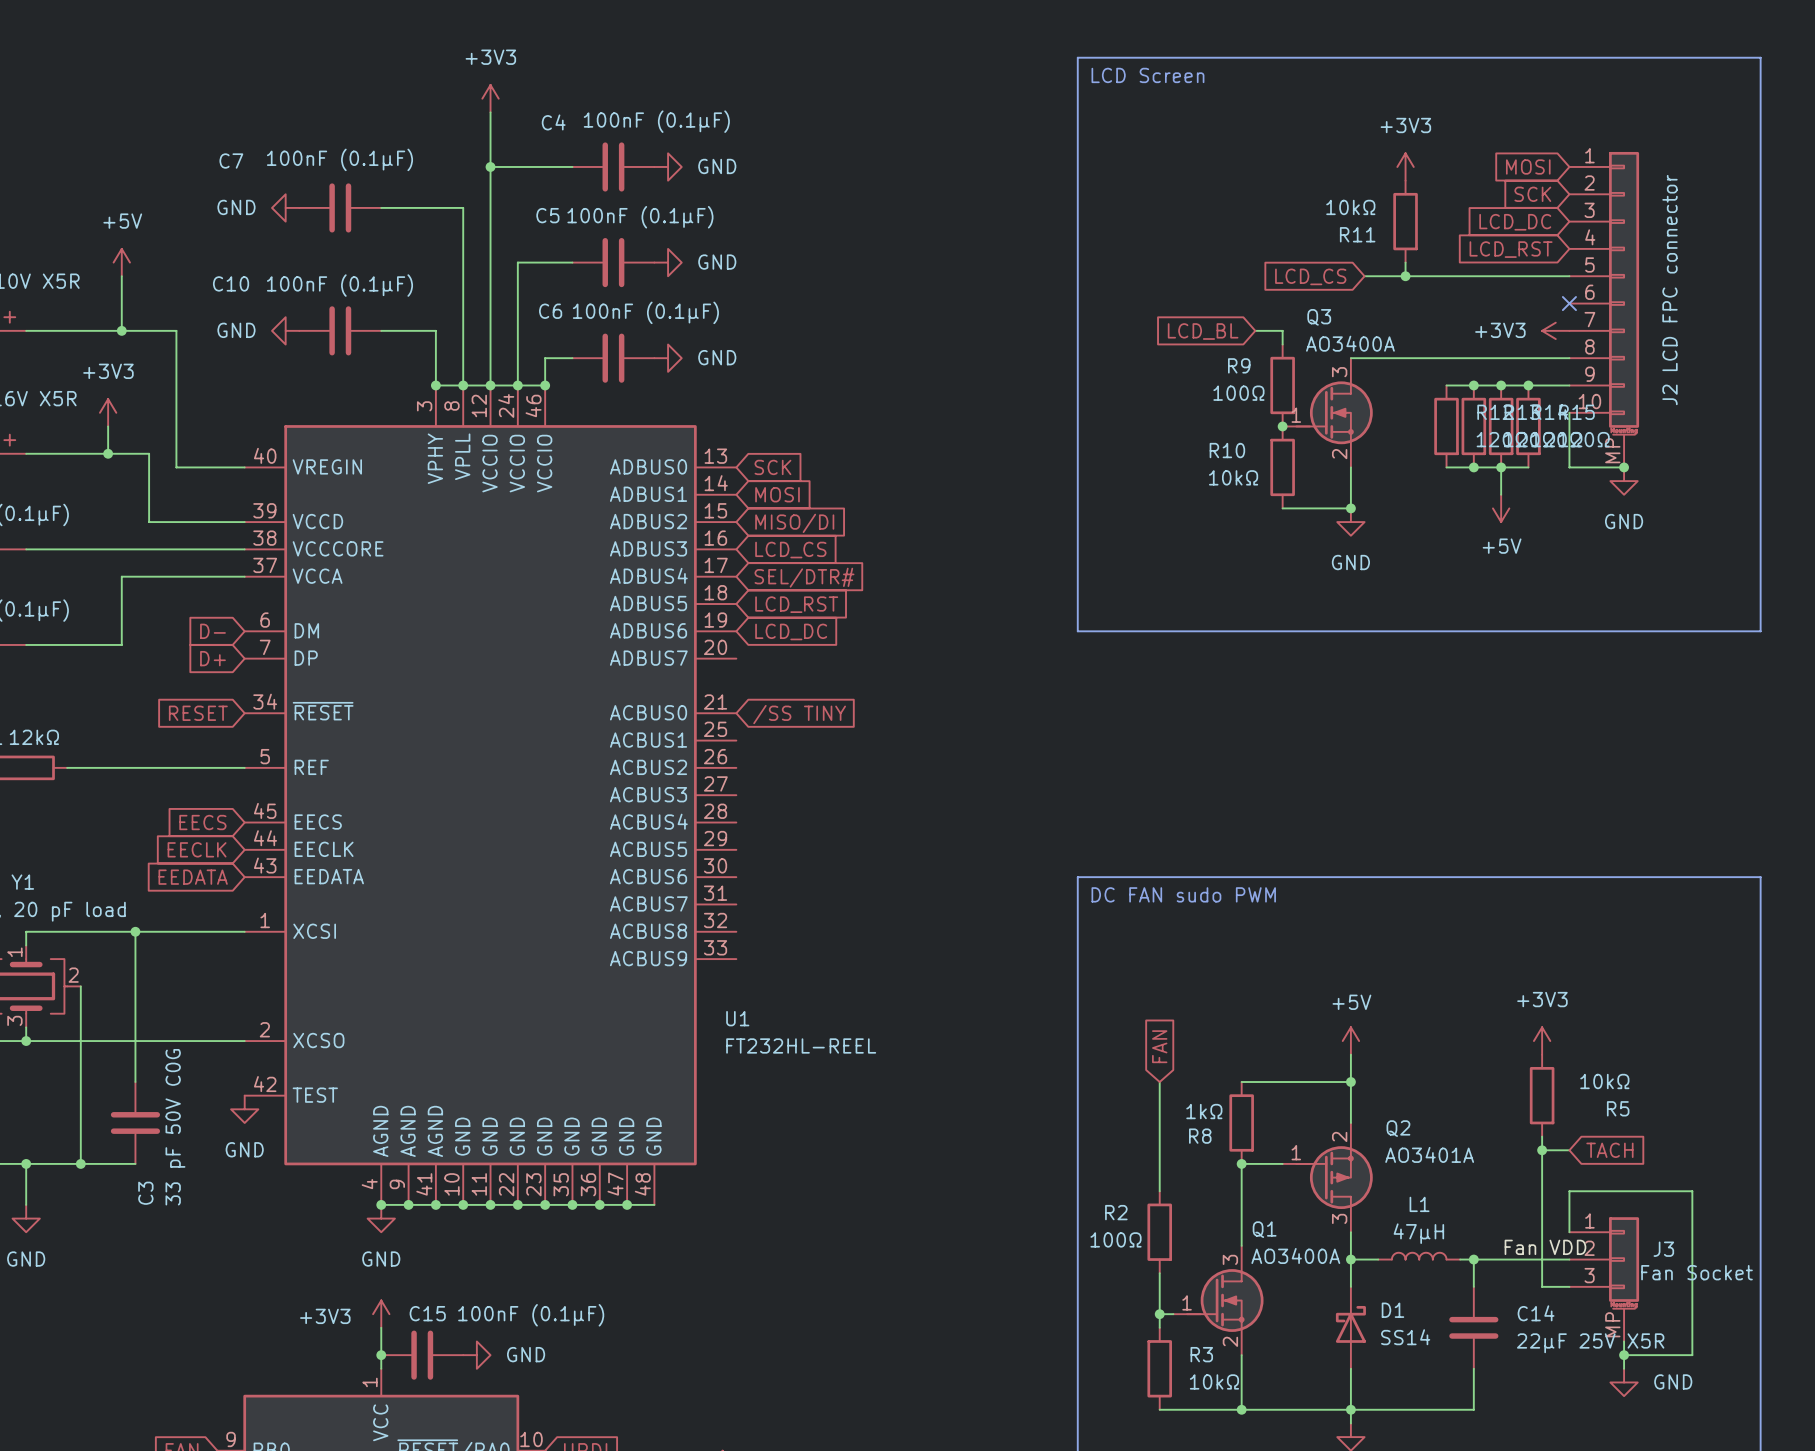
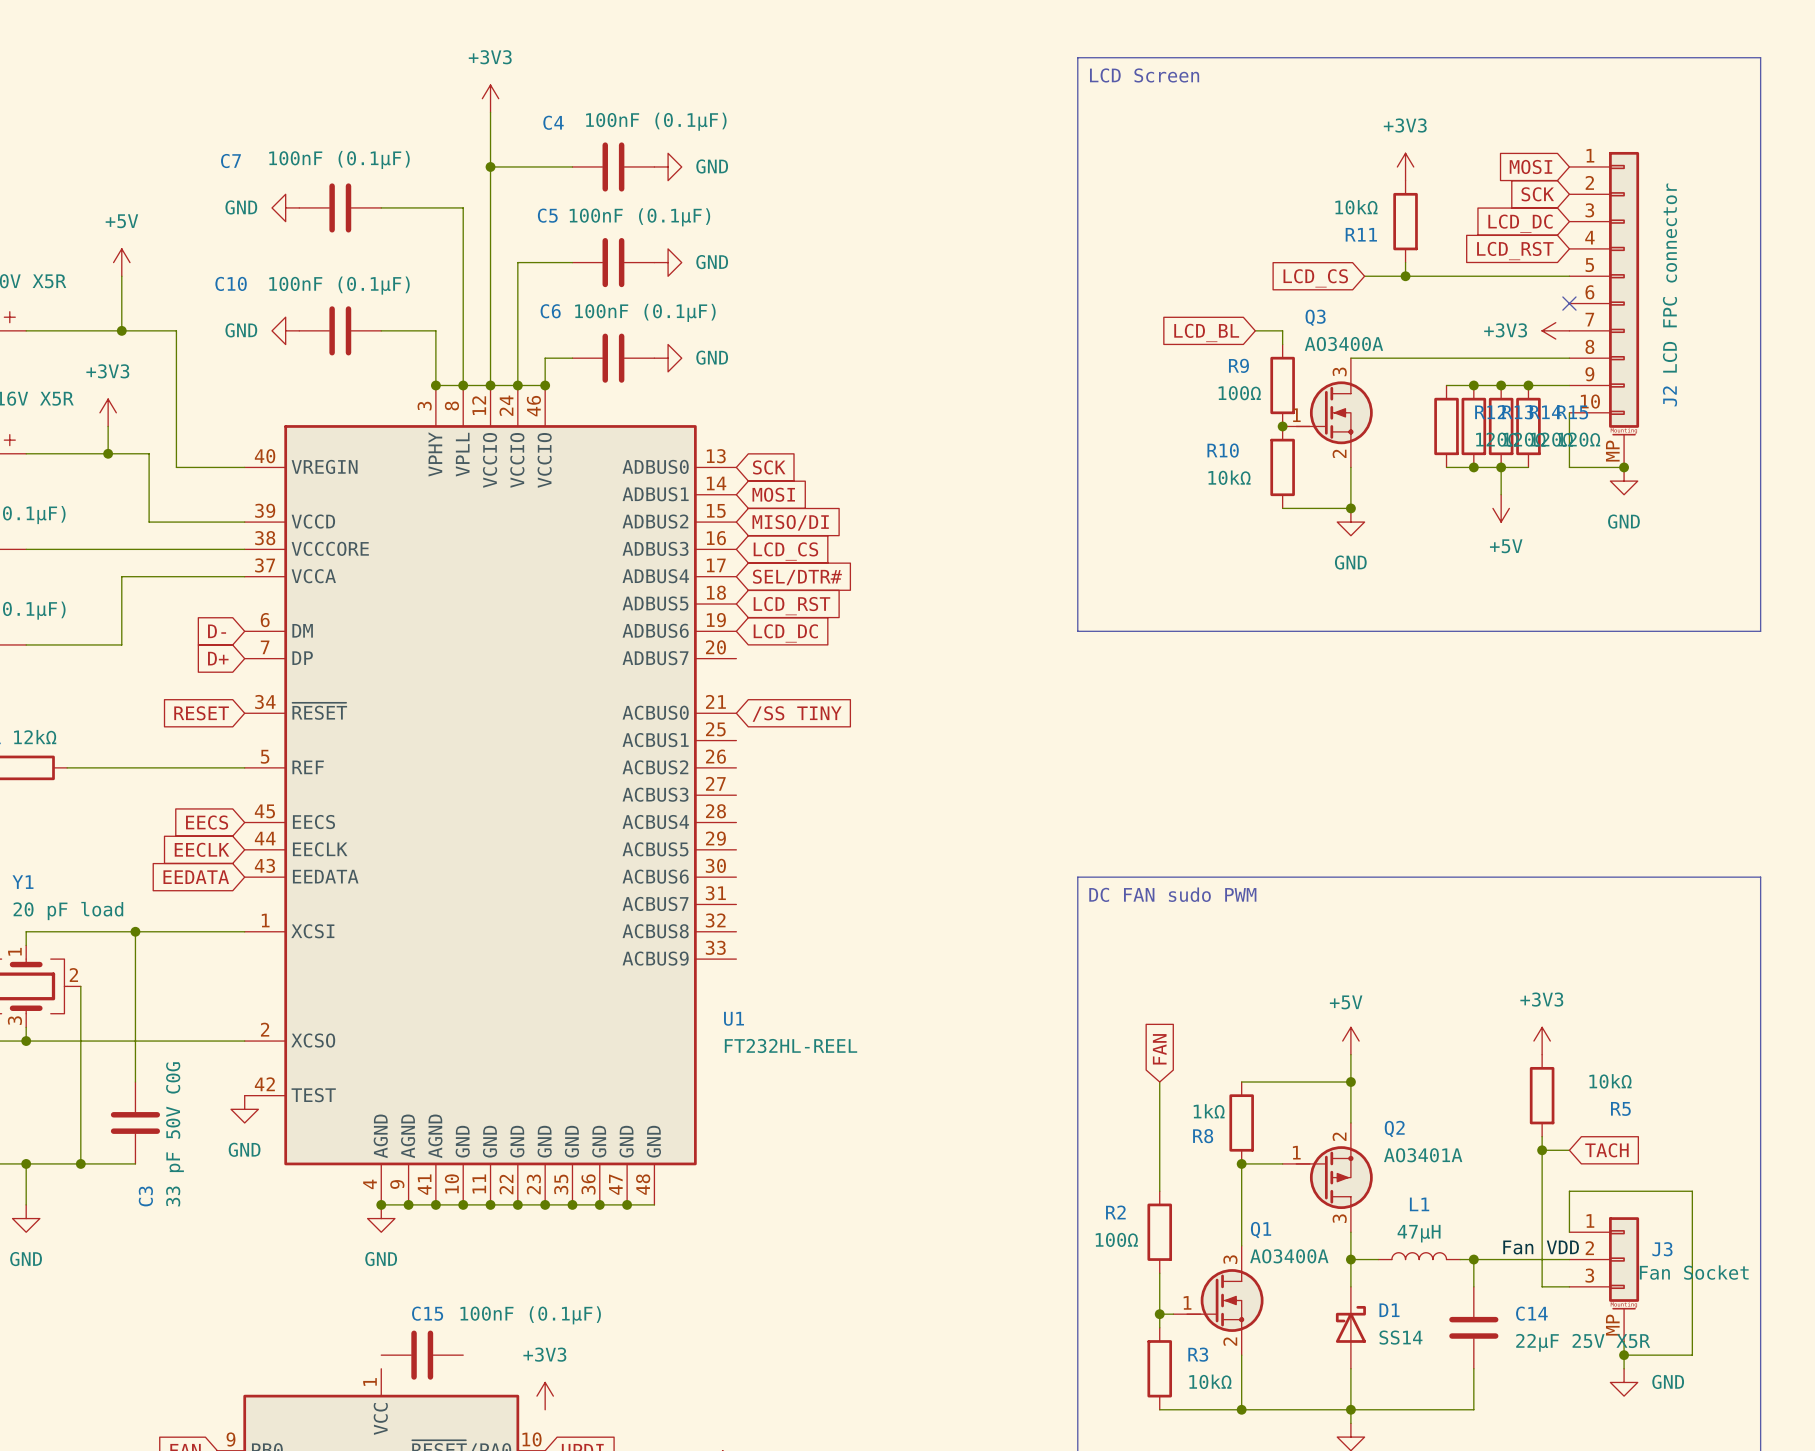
power symbol: +3V3 (381, 1314) -> none
wire: (381, 1327) (381, 1368) -> none
junction: (381, 1355) -> none
power symbol: GND (476, 1355) -> none
power symbol: none -> +3V3 (545, 1396)

